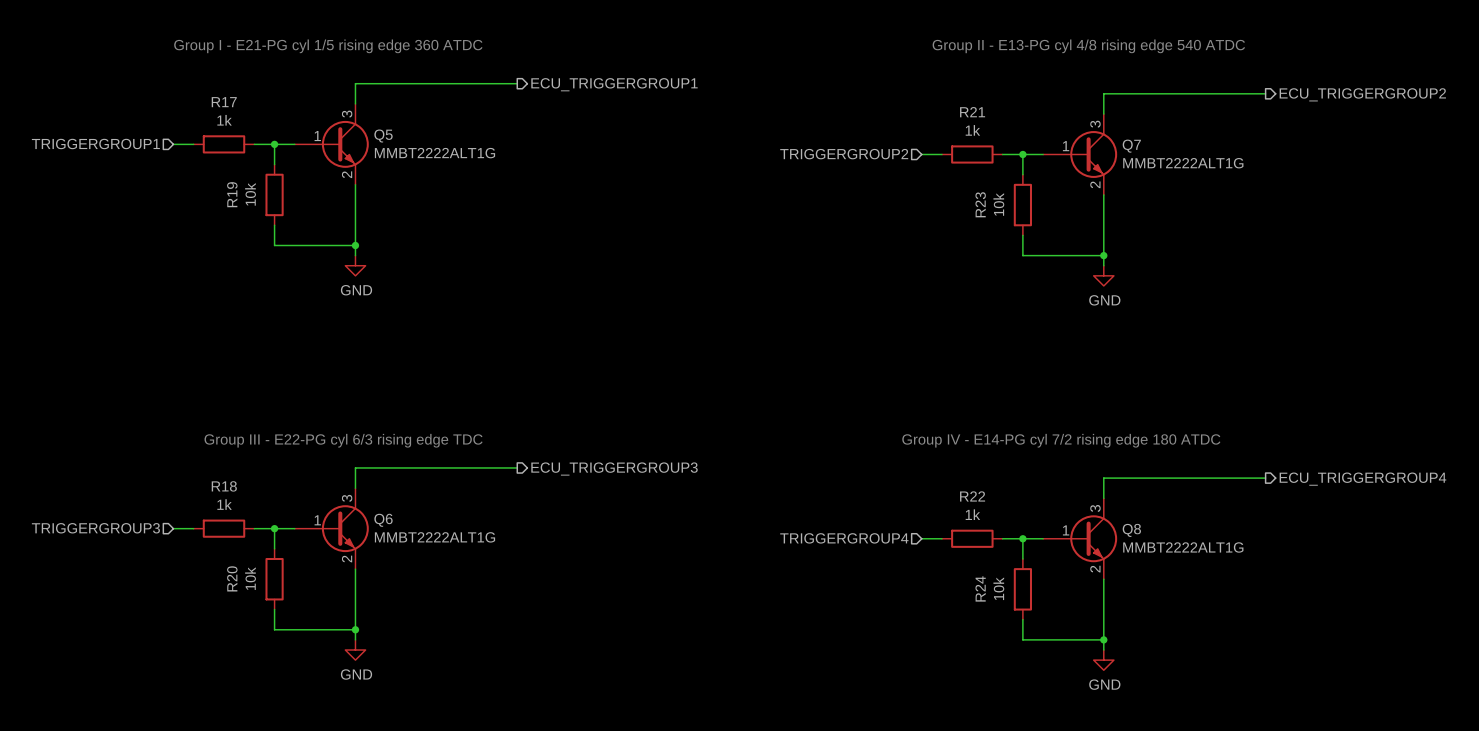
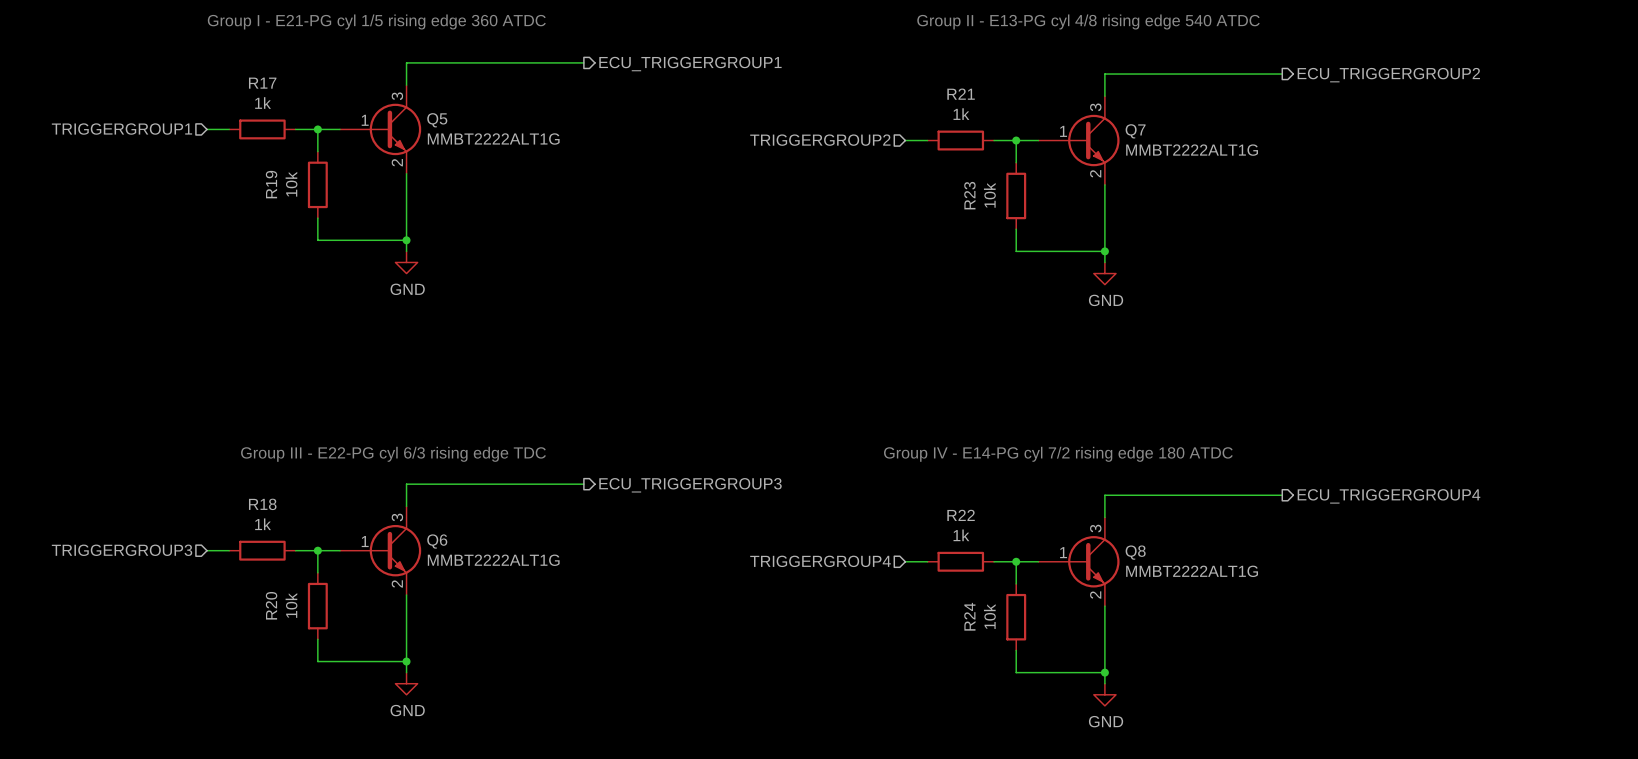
text position: Group II - E13-PG cyl 4/8 rising edge 540 ATDC (1088, 46) -> Group II - E13-PG cyl 4/8 rising edge 540 ATDC (1088, 21)
wire: (1103, 93) (1103, 114) -> (1226, 74) (1104, 74) (1104, 96)
wire: (1154, 93) (1265, 93) -> none
hierarchical label position: ECU_TRIGGERGROUP2 (1362, 94) -> ECU_TRIGGERGROUP2 (1388, 75)
hierarchical label position: TRIGGERGROUP2 (844, 154) -> TRIGGERGROUP2 (820, 140)
wire: none -> (994, 140) (1027, 140)
junction: none -> (1016, 140)
R21 position: (972, 154) -> (960, 140)
wire: (1002, 154) (1043, 154) -> none
wire: (1022, 154) (1022, 174) -> (1016, 140) (1016, 162)
junction: (1022, 154) -> none
Q7 position: (1080, 154) -> (1078, 140)
wire: (1103, 194) (1103, 265) -> (1104, 184) (1104, 262)
R23 position: (1022, 205) -> (1016, 195)
wire: (1022, 235) (1022, 255) (1103, 255) -> (1016, 229) (1016, 251) (1104, 251)
junction: none -> (1104, 251)
junction: (1103, 255) -> none
power symbol position: GND (1103, 275) -> GND (1104, 273)
text position: Group IV - E14-PG cyl 7/2 rising edge 180 ATDC (1061, 440) -> Group IV - E14-PG cyl 7/2 rising edge 180 ATDC (1058, 454)
wire: (1103, 478) (1103, 498) -> (1226, 495) (1104, 495) (1104, 517)
wire: (1154, 478) (1265, 478) -> none
hierarchical label position: ECU_TRIGGERGROUP4 (1362, 479) -> ECU_TRIGGERGROUP4 (1388, 496)
hierarchical label position: TRIGGERGROUP4 (844, 538) -> TRIGGERGROUP4 (820, 561)
wire: none -> (994, 561) (1027, 561)
junction: none -> (1016, 561)
R22 position: (972, 538) -> (960, 561)
wire: (1002, 538) (1043, 538) -> none
wire: (1022, 538) (1022, 558) -> (1016, 561) (1016, 583)
junction: (1022, 538) -> none
Q8 position: (1080, 538) -> (1078, 561)
wire: (1103, 579) (1103, 650) -> (1104, 606) (1104, 683)
R24 position: (1022, 589) -> (1016, 617)
wire: (1022, 619) (1022, 639) (1103, 639) -> (1016, 650) (1016, 672) (1104, 672)
junction: none -> (1104, 672)
junction: (1103, 639) -> none
power symbol position: GND (1103, 660) -> GND (1104, 694)

